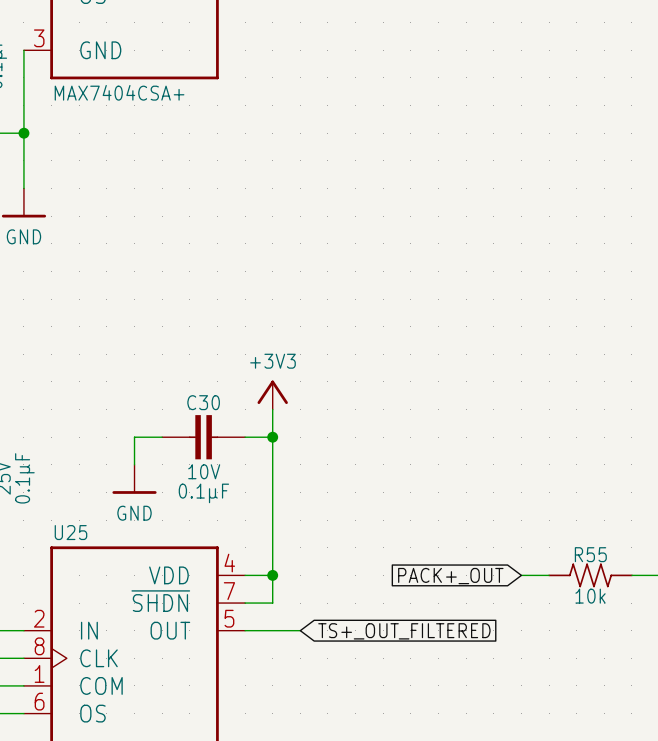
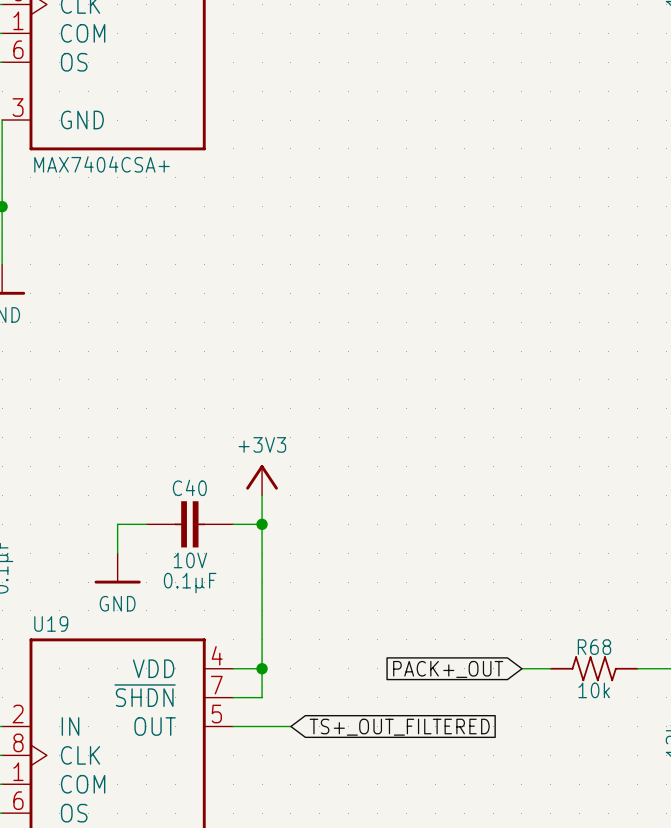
C30 name: C30 (203, 402) -> C40 (189, 487)
U25 name: U25 (70, 532) -> U19 (51, 623)
R55 name: R55 (590, 554) -> R68 (594, 647)

